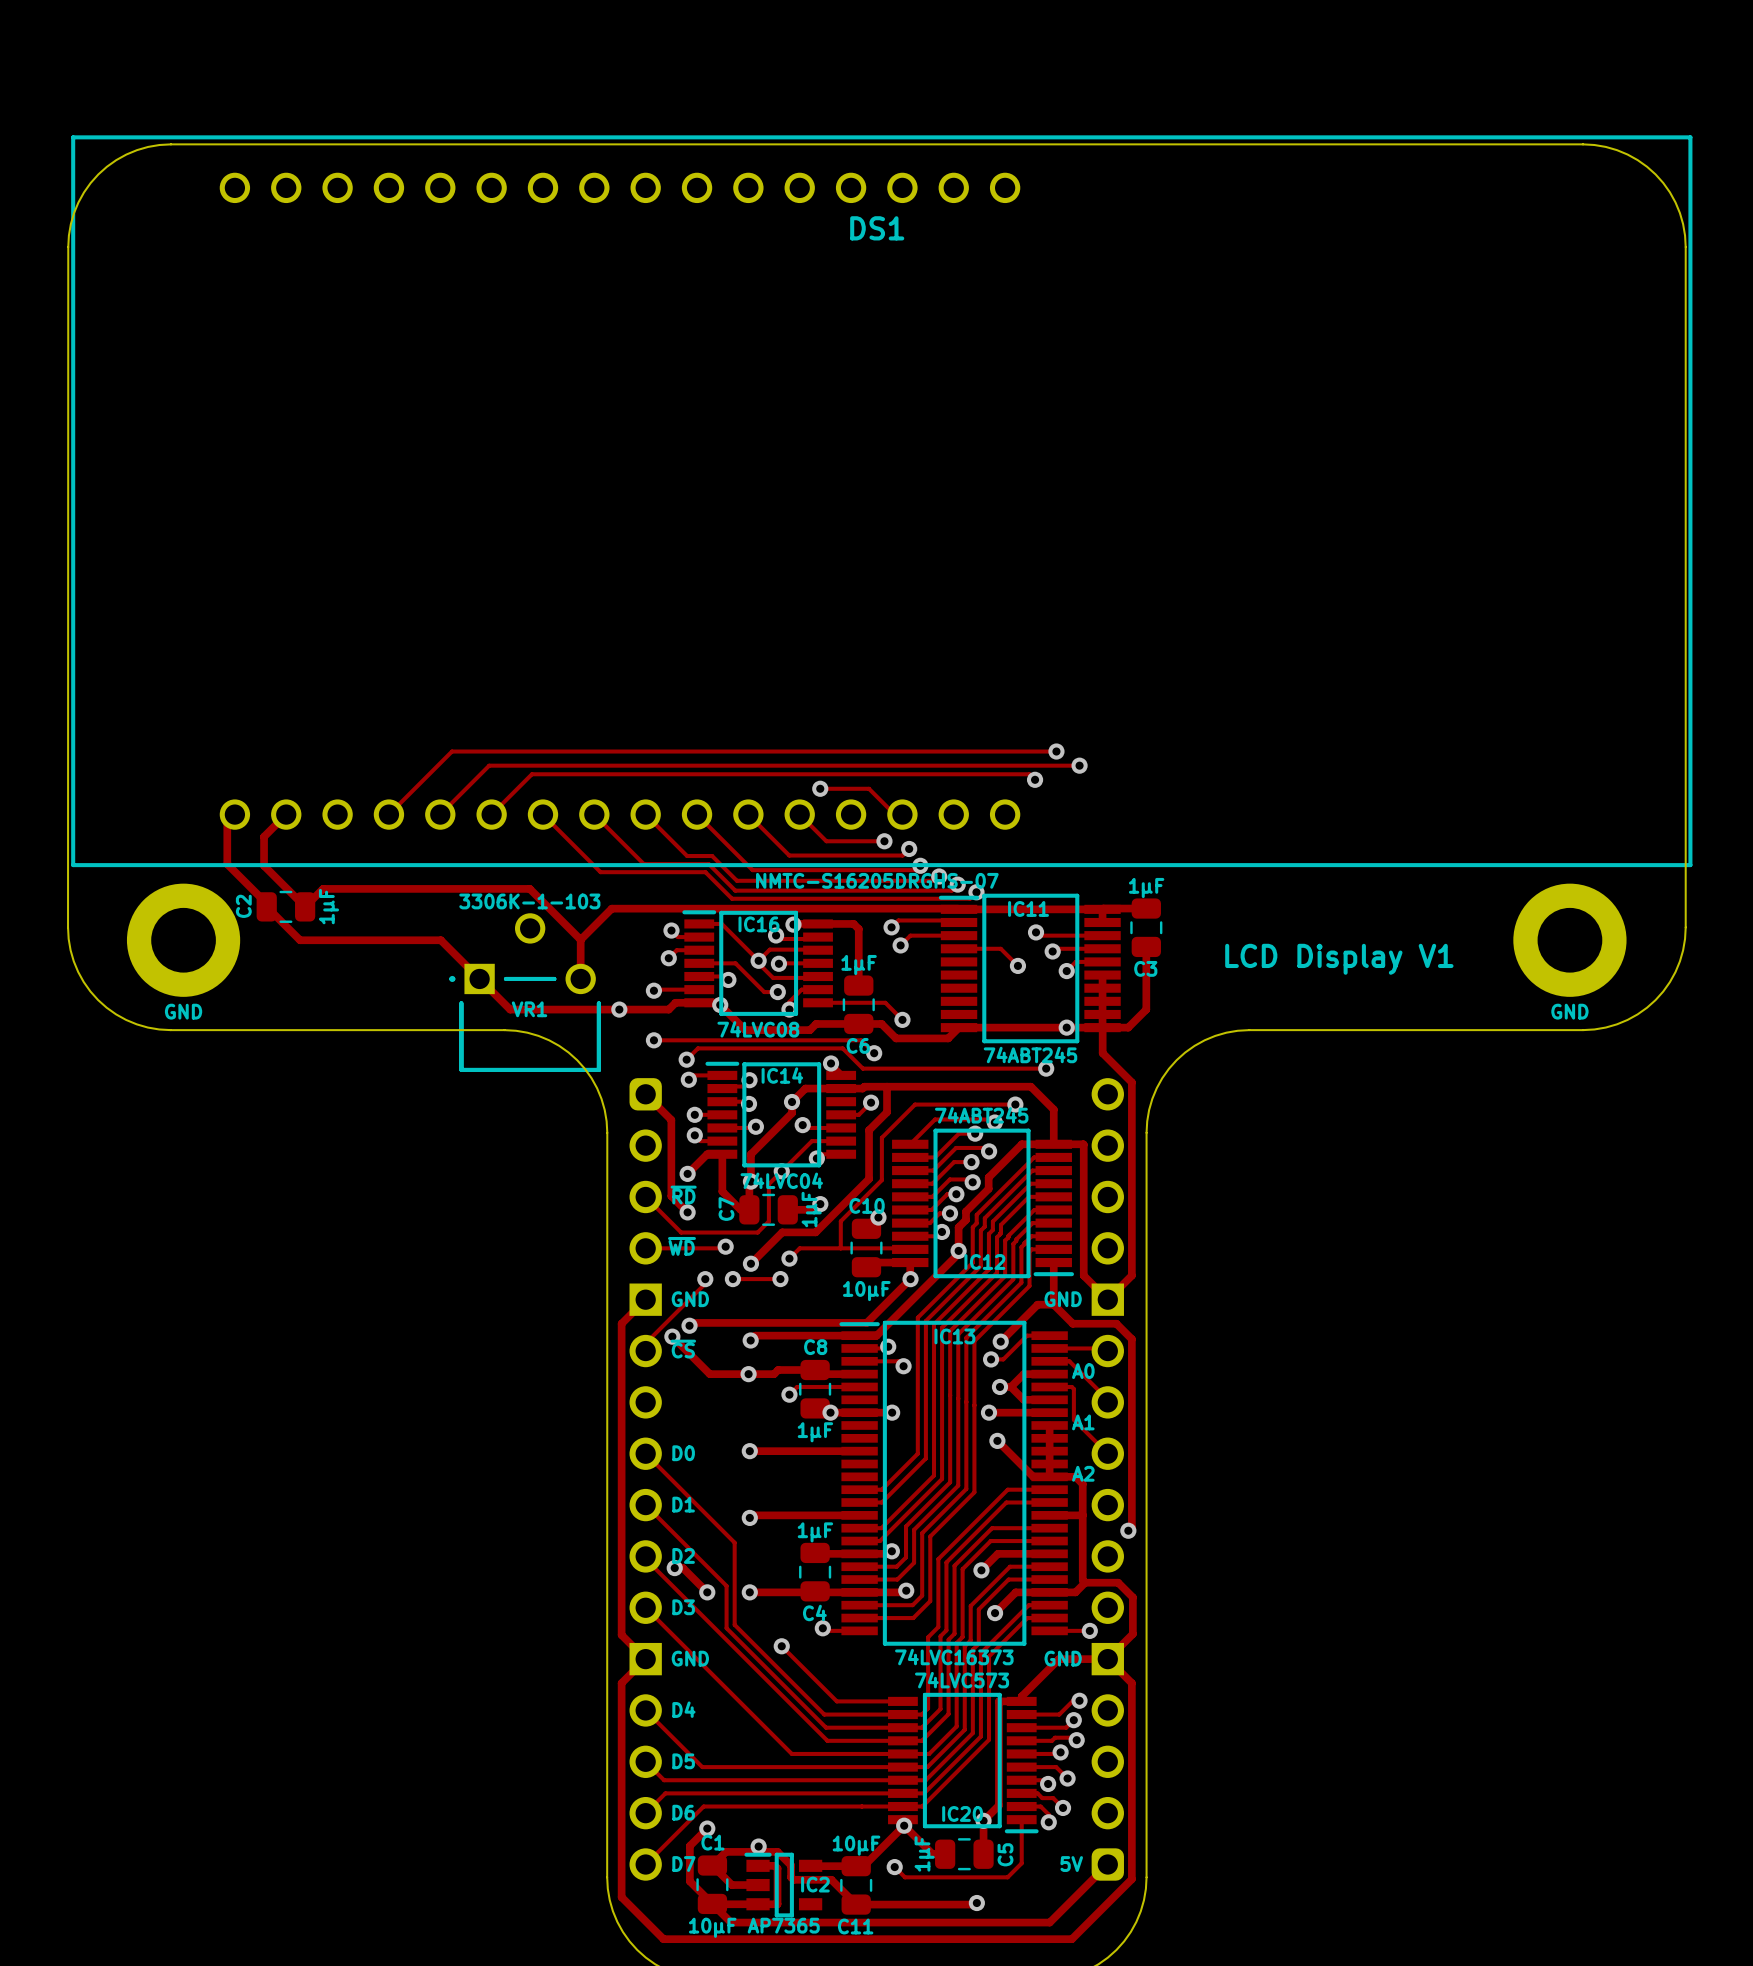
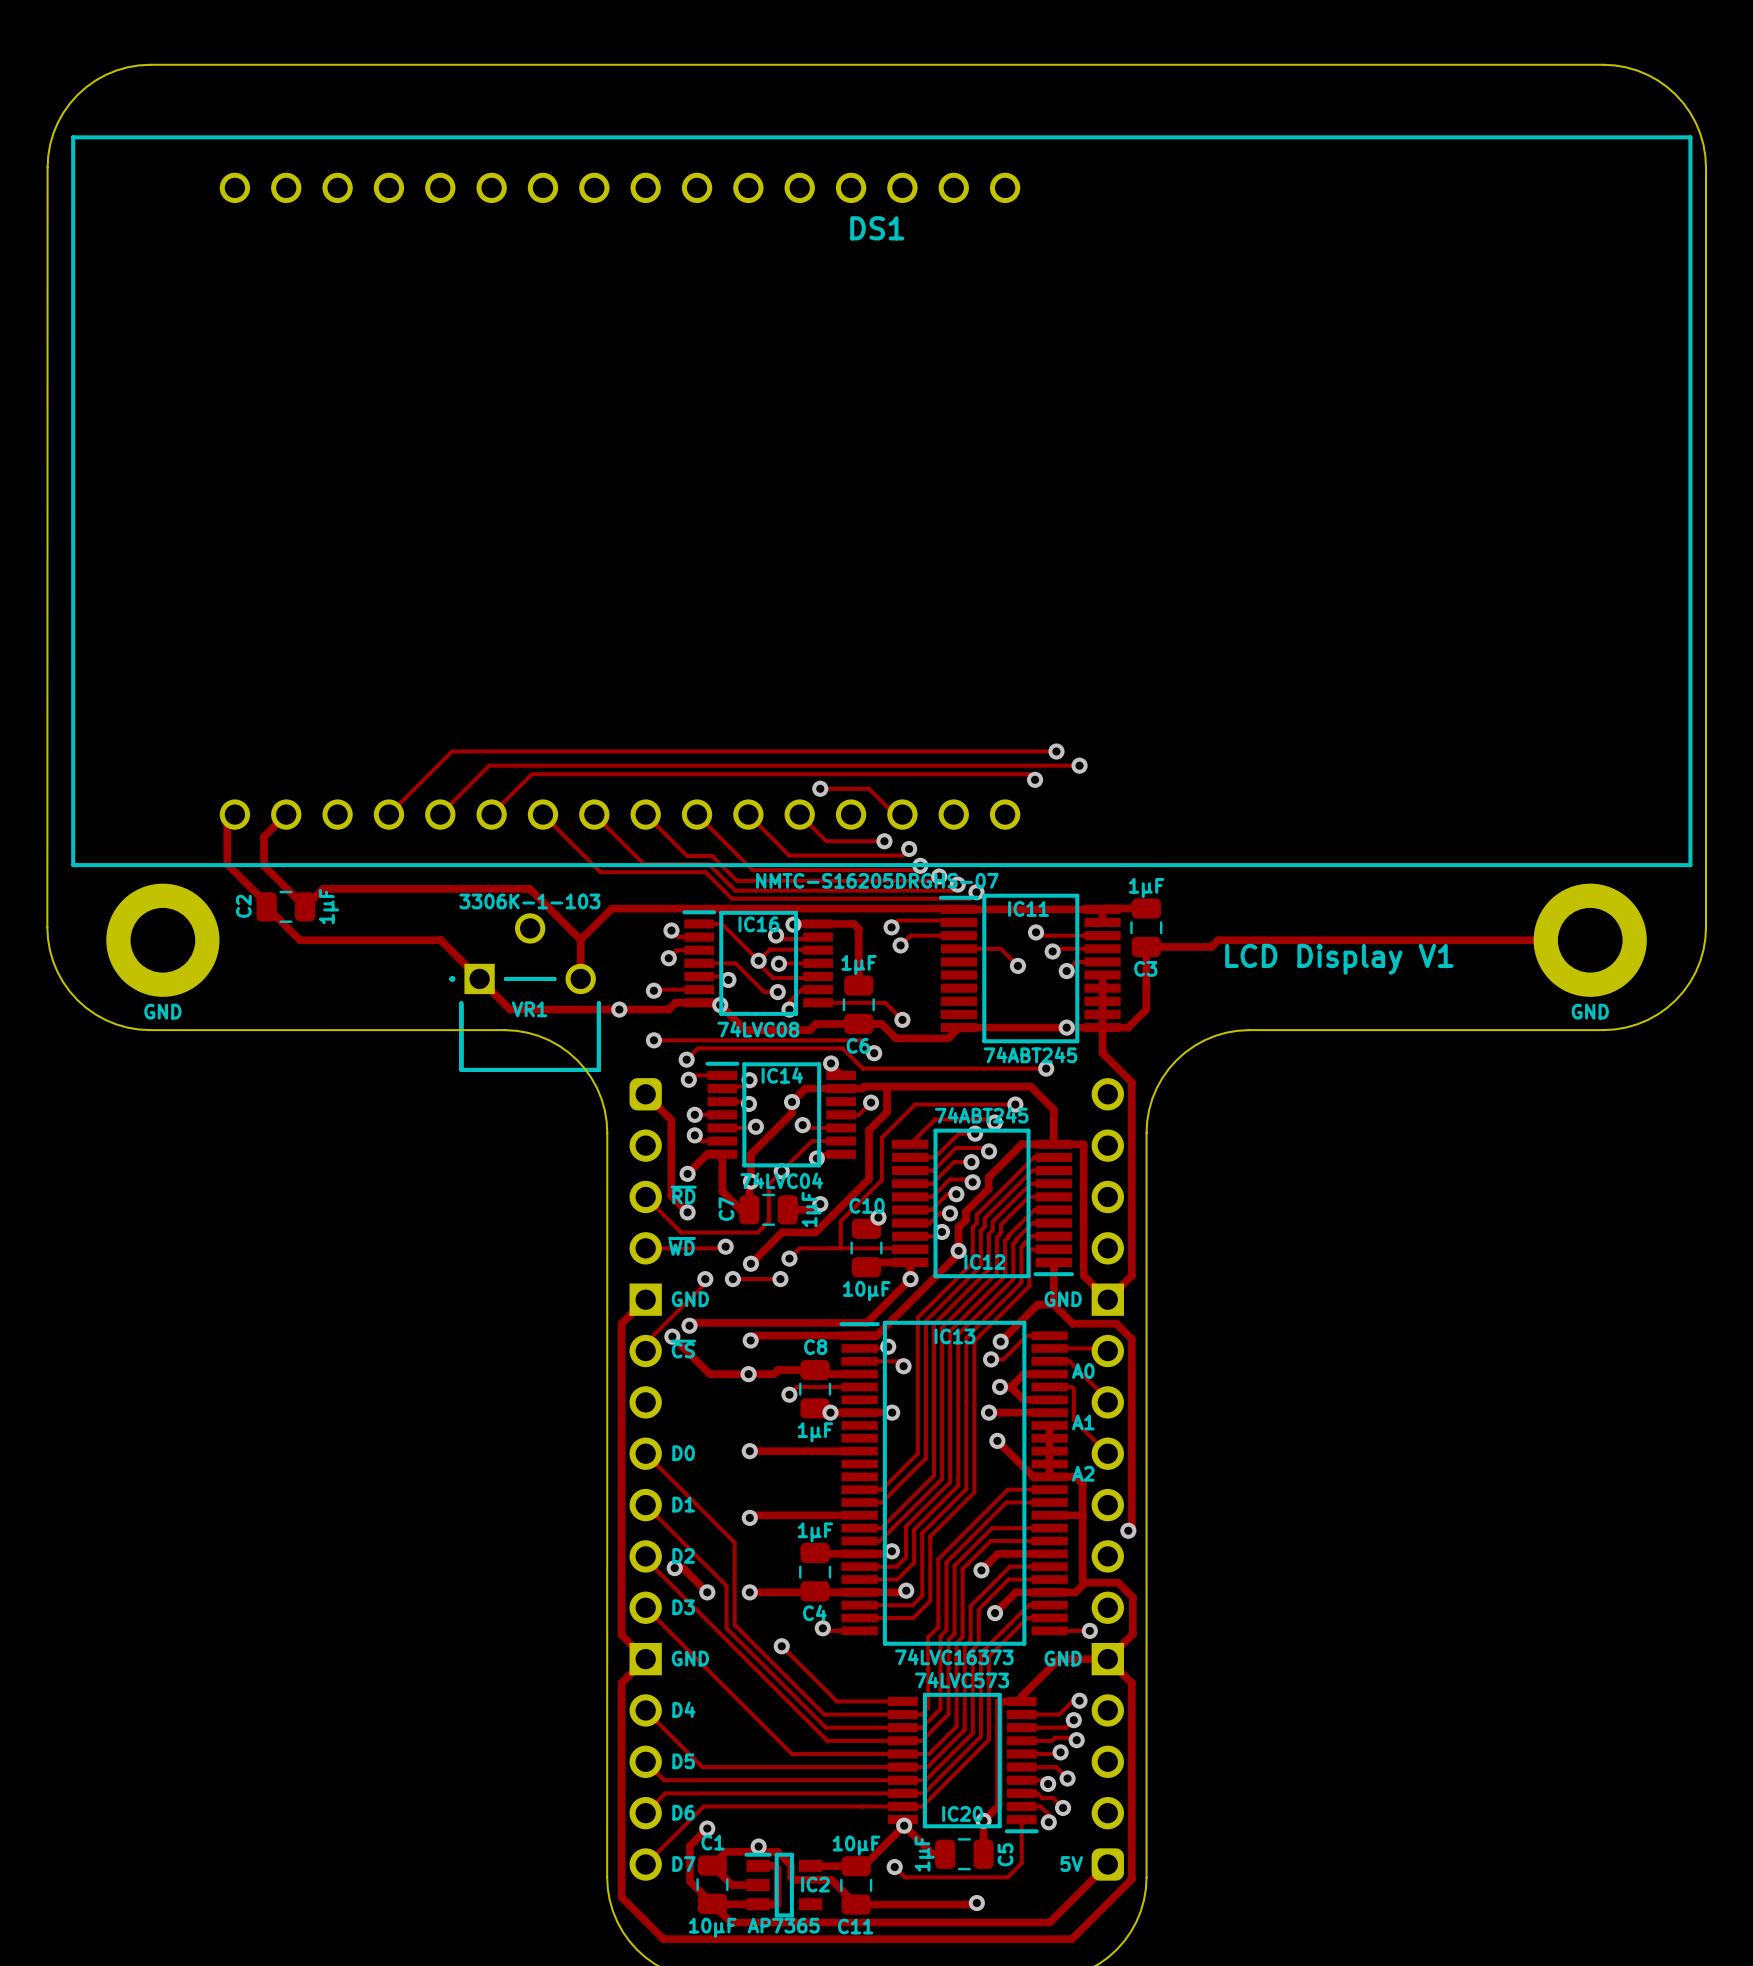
part position: (183, 940) -> (162, 940)
track: none -> (1569, 940) (1218, 940) (1211, 946) (1146, 946)
part position: (1569, 940) -> (1590, 940)
board edge: (170, 1030) (136, 1024) (116, 1014) (98, 1000) (78, 971) (70, 950) (68, 927) (68, 235) (74, 213) (84, 192) (106, 166) (137, 150) (170, 144) (1583, 144) (1605, 146) (1637, 160) (1655, 174) (1669, 192) (1679, 213) (1685, 235) (1685, 938) (1675, 971) (1655, 1000) (1627, 1019) (1605, 1027) (1583, 1030) -> (170, 1030) (127, 1027) (105, 1019) (86, 1007) (69, 991) (57, 971) (49, 950) (47, 927) (48, 155) (53, 133) (63, 112) (86, 87) (116, 70) (150, 64) (1603, 64) (1626, 67) (1657, 80) (1675, 94) (1695, 122) (1703, 144) (1706, 167) (1705, 938) (1695, 971) (1683, 991) (1667, 1007) (1647, 1019) (1626, 1027) (1583, 1030)

